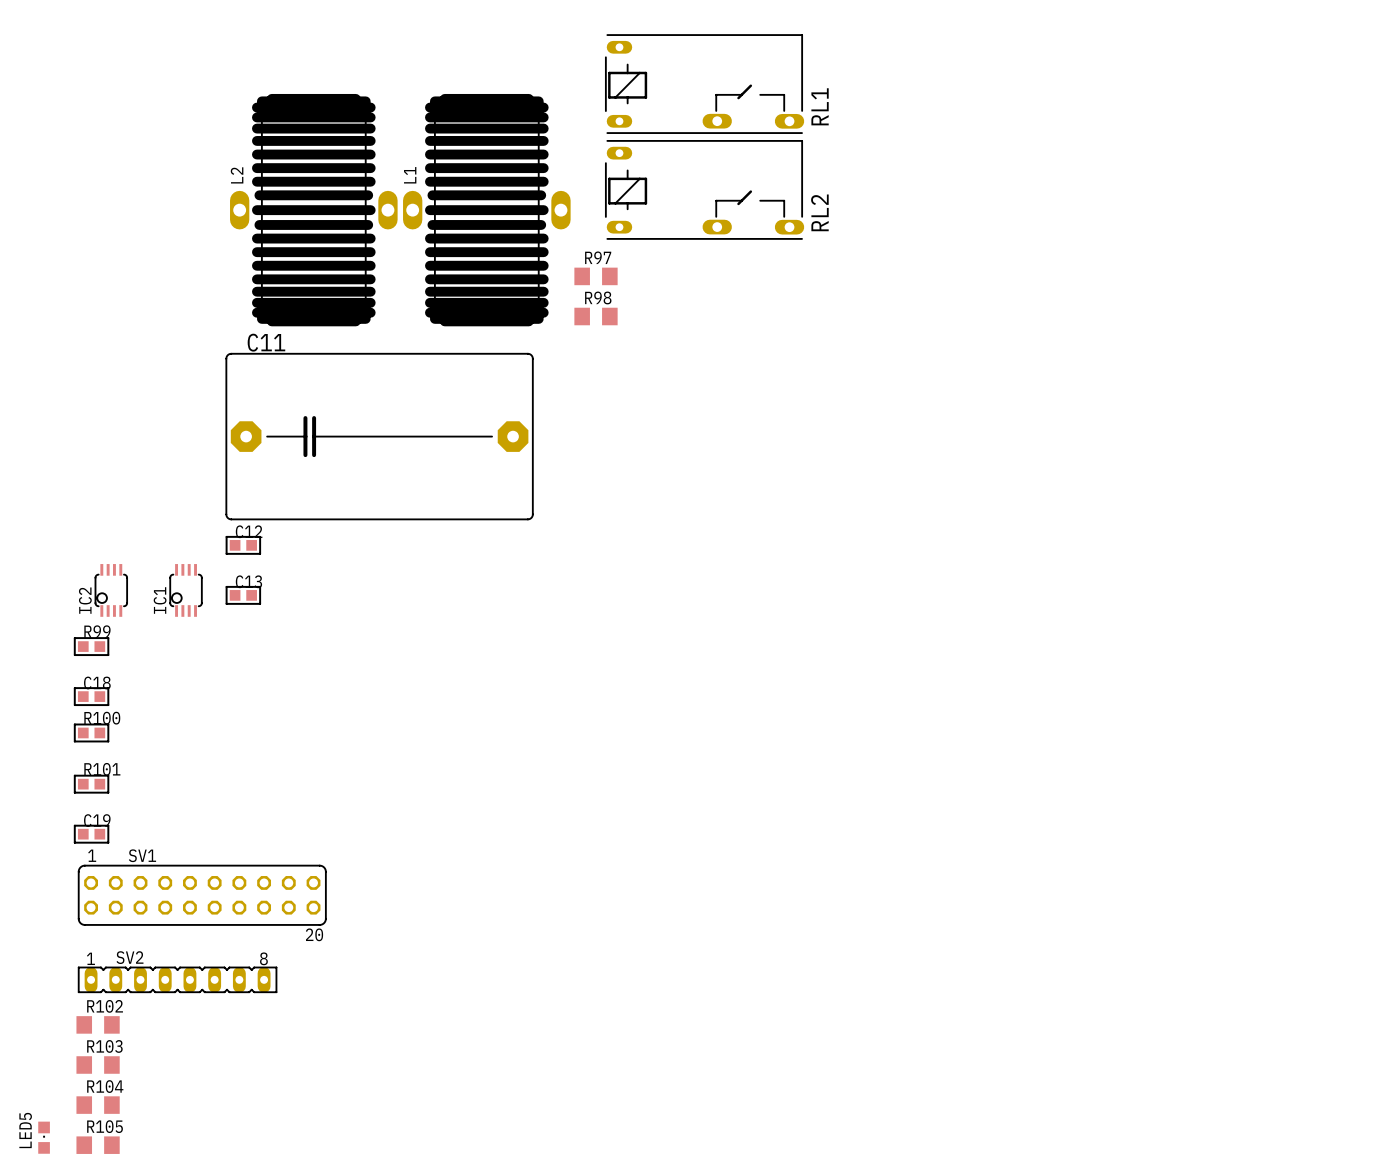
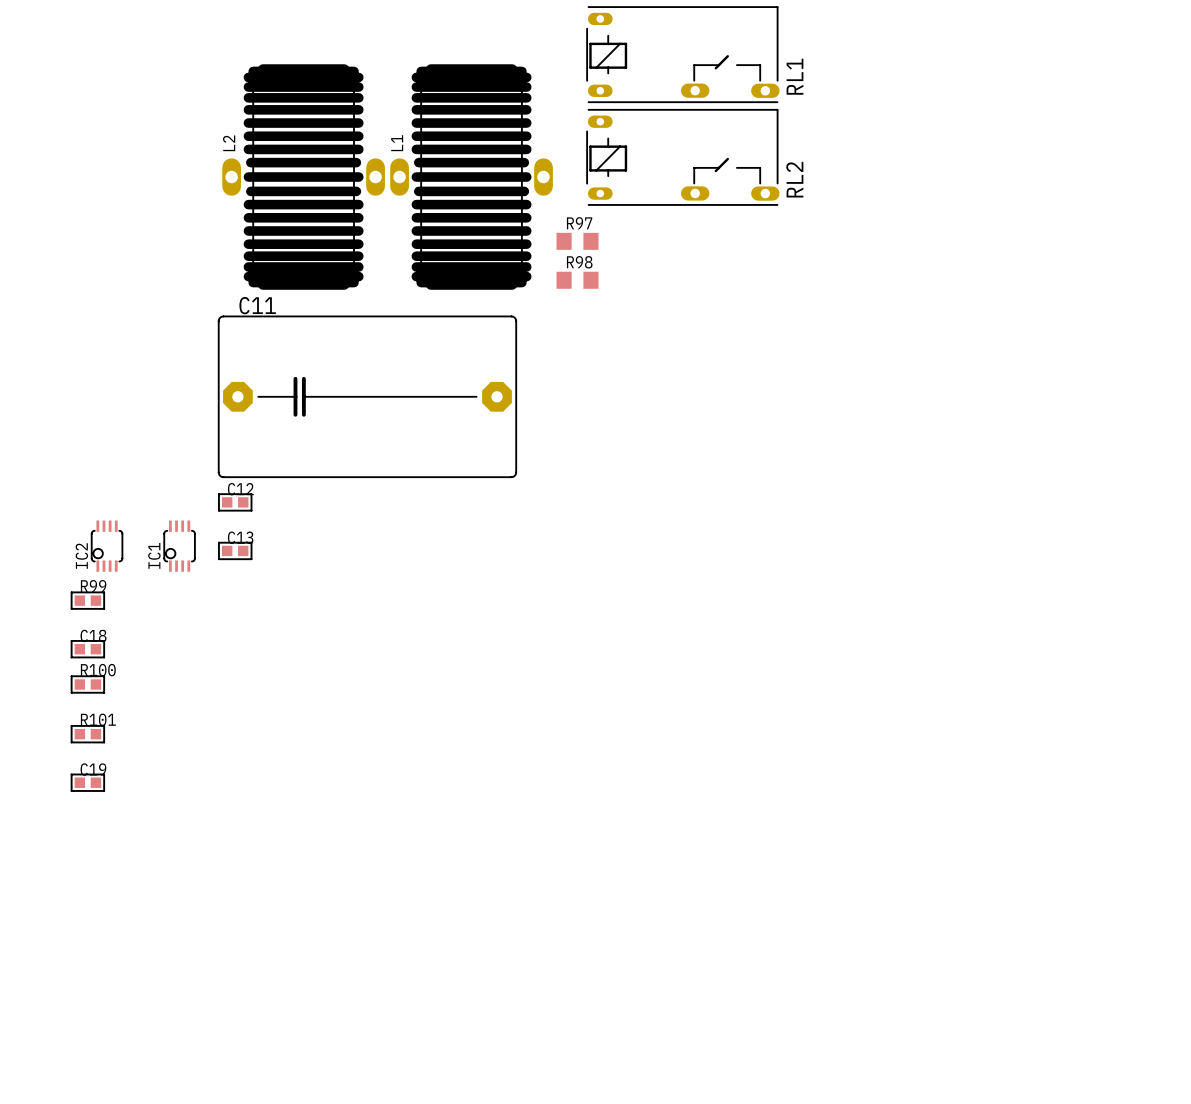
SV1: (202, 895) -> none
SV2: (177, 979) -> none
R102: (98, 1024) -> none
R103: (98, 1065) -> none
R104: (98, 1105) -> none
LED5: (44, 1137) -> none
R105: (98, 1145) -> none

